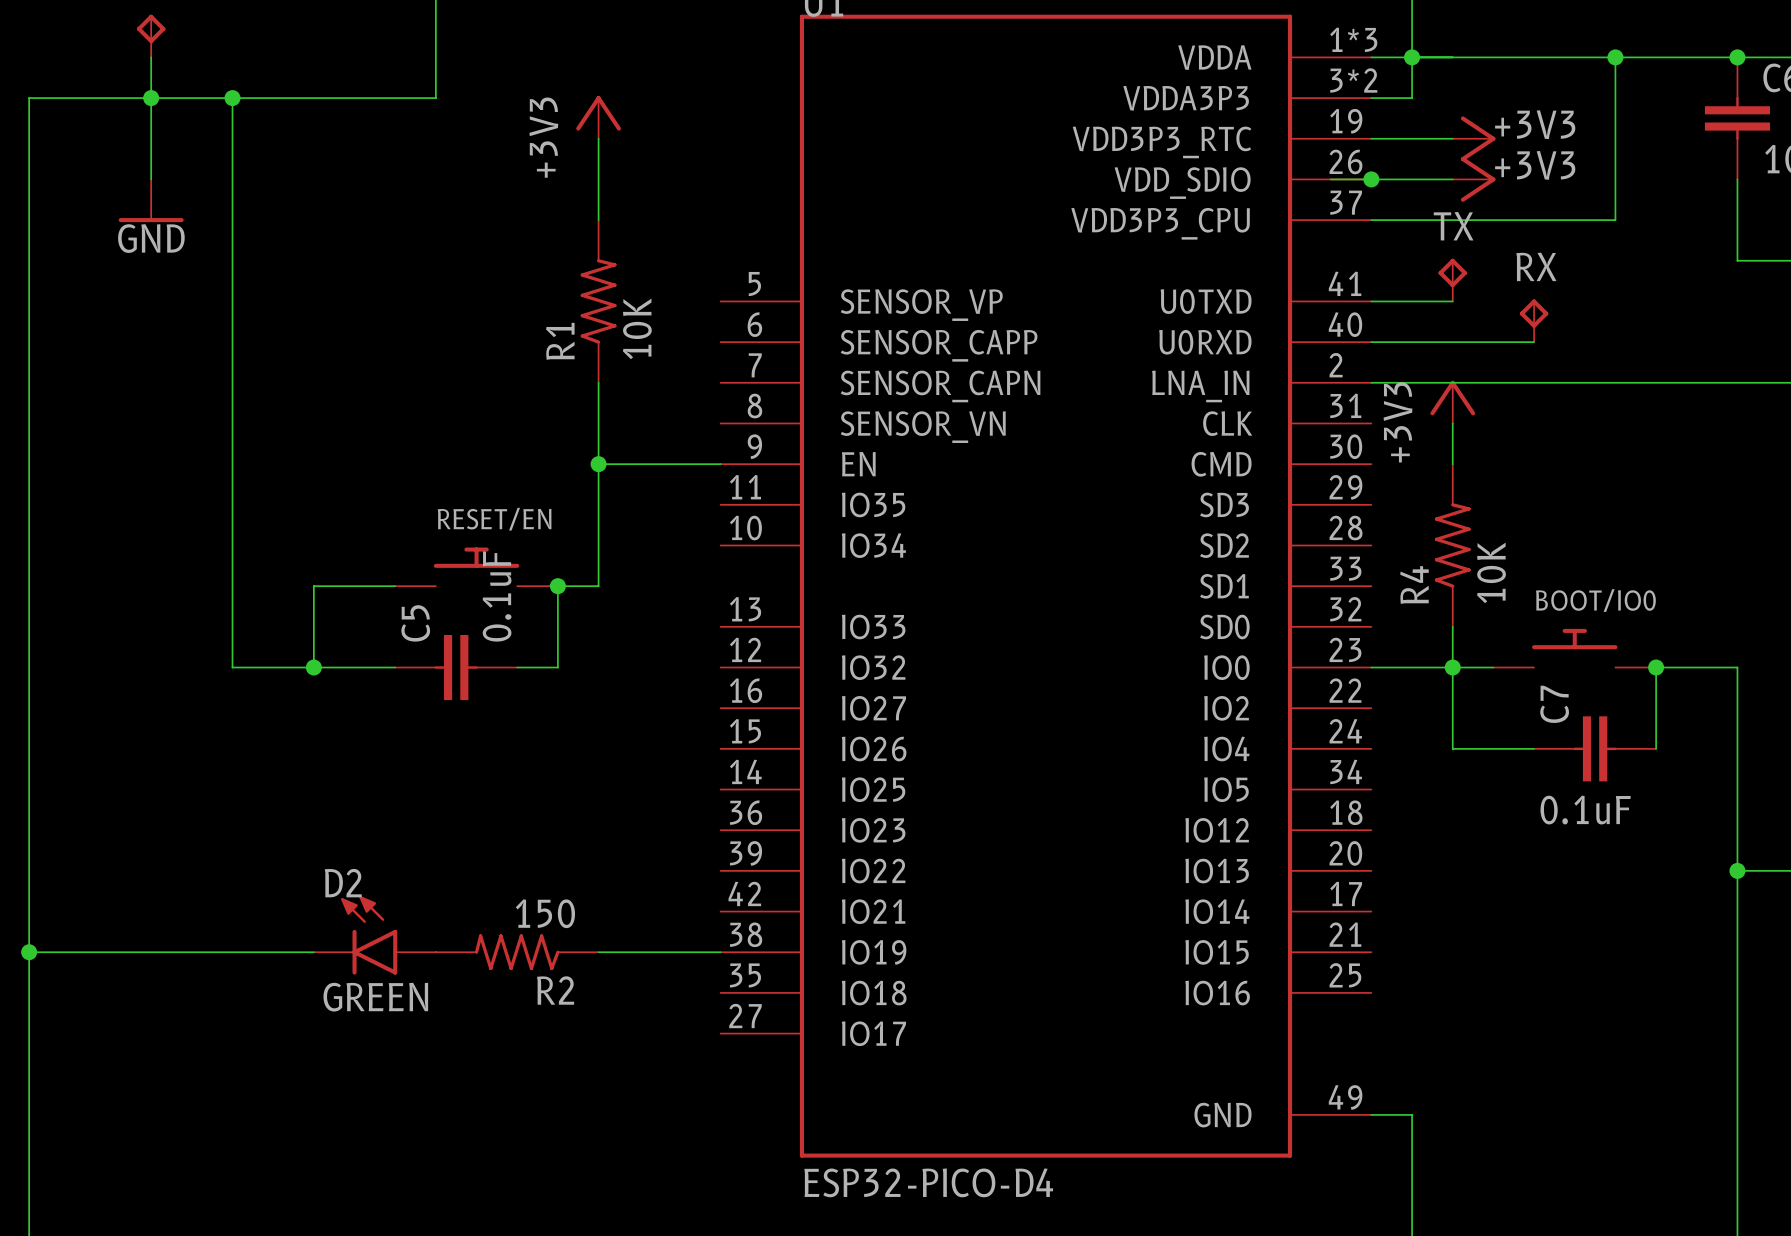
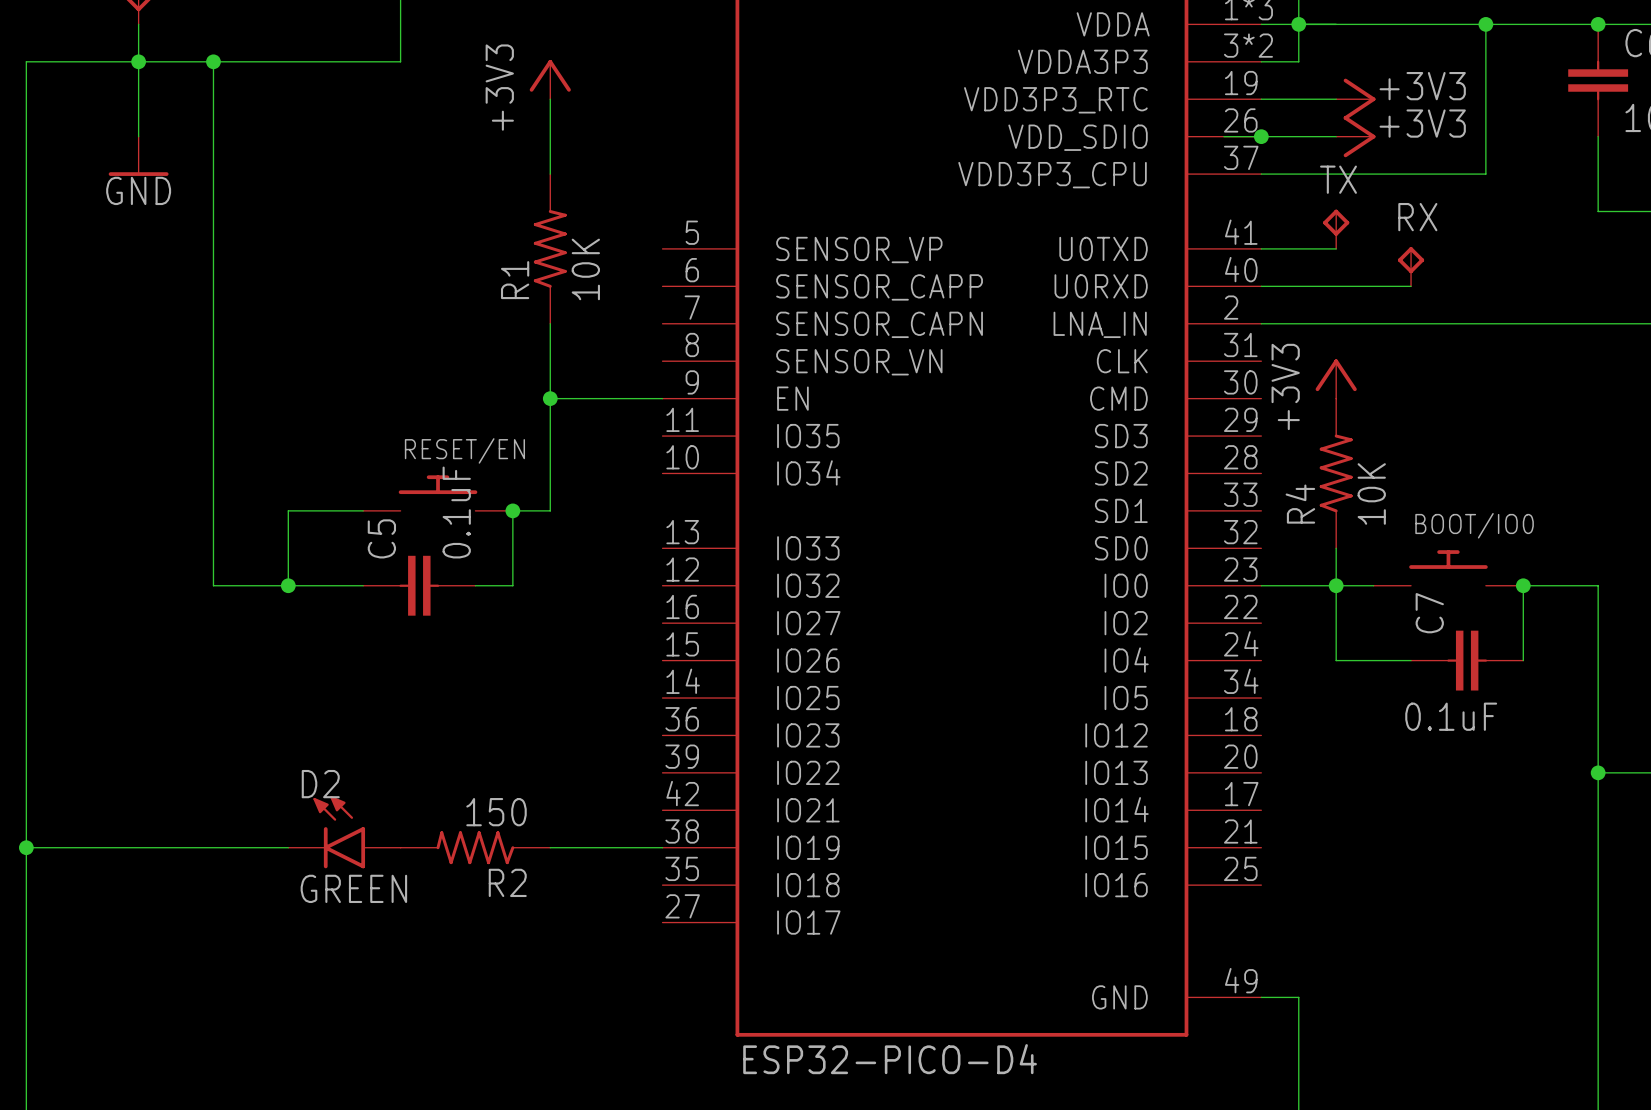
power symbol position: +3V3 (1452, 402) -> +3V3 (1336, 378)

